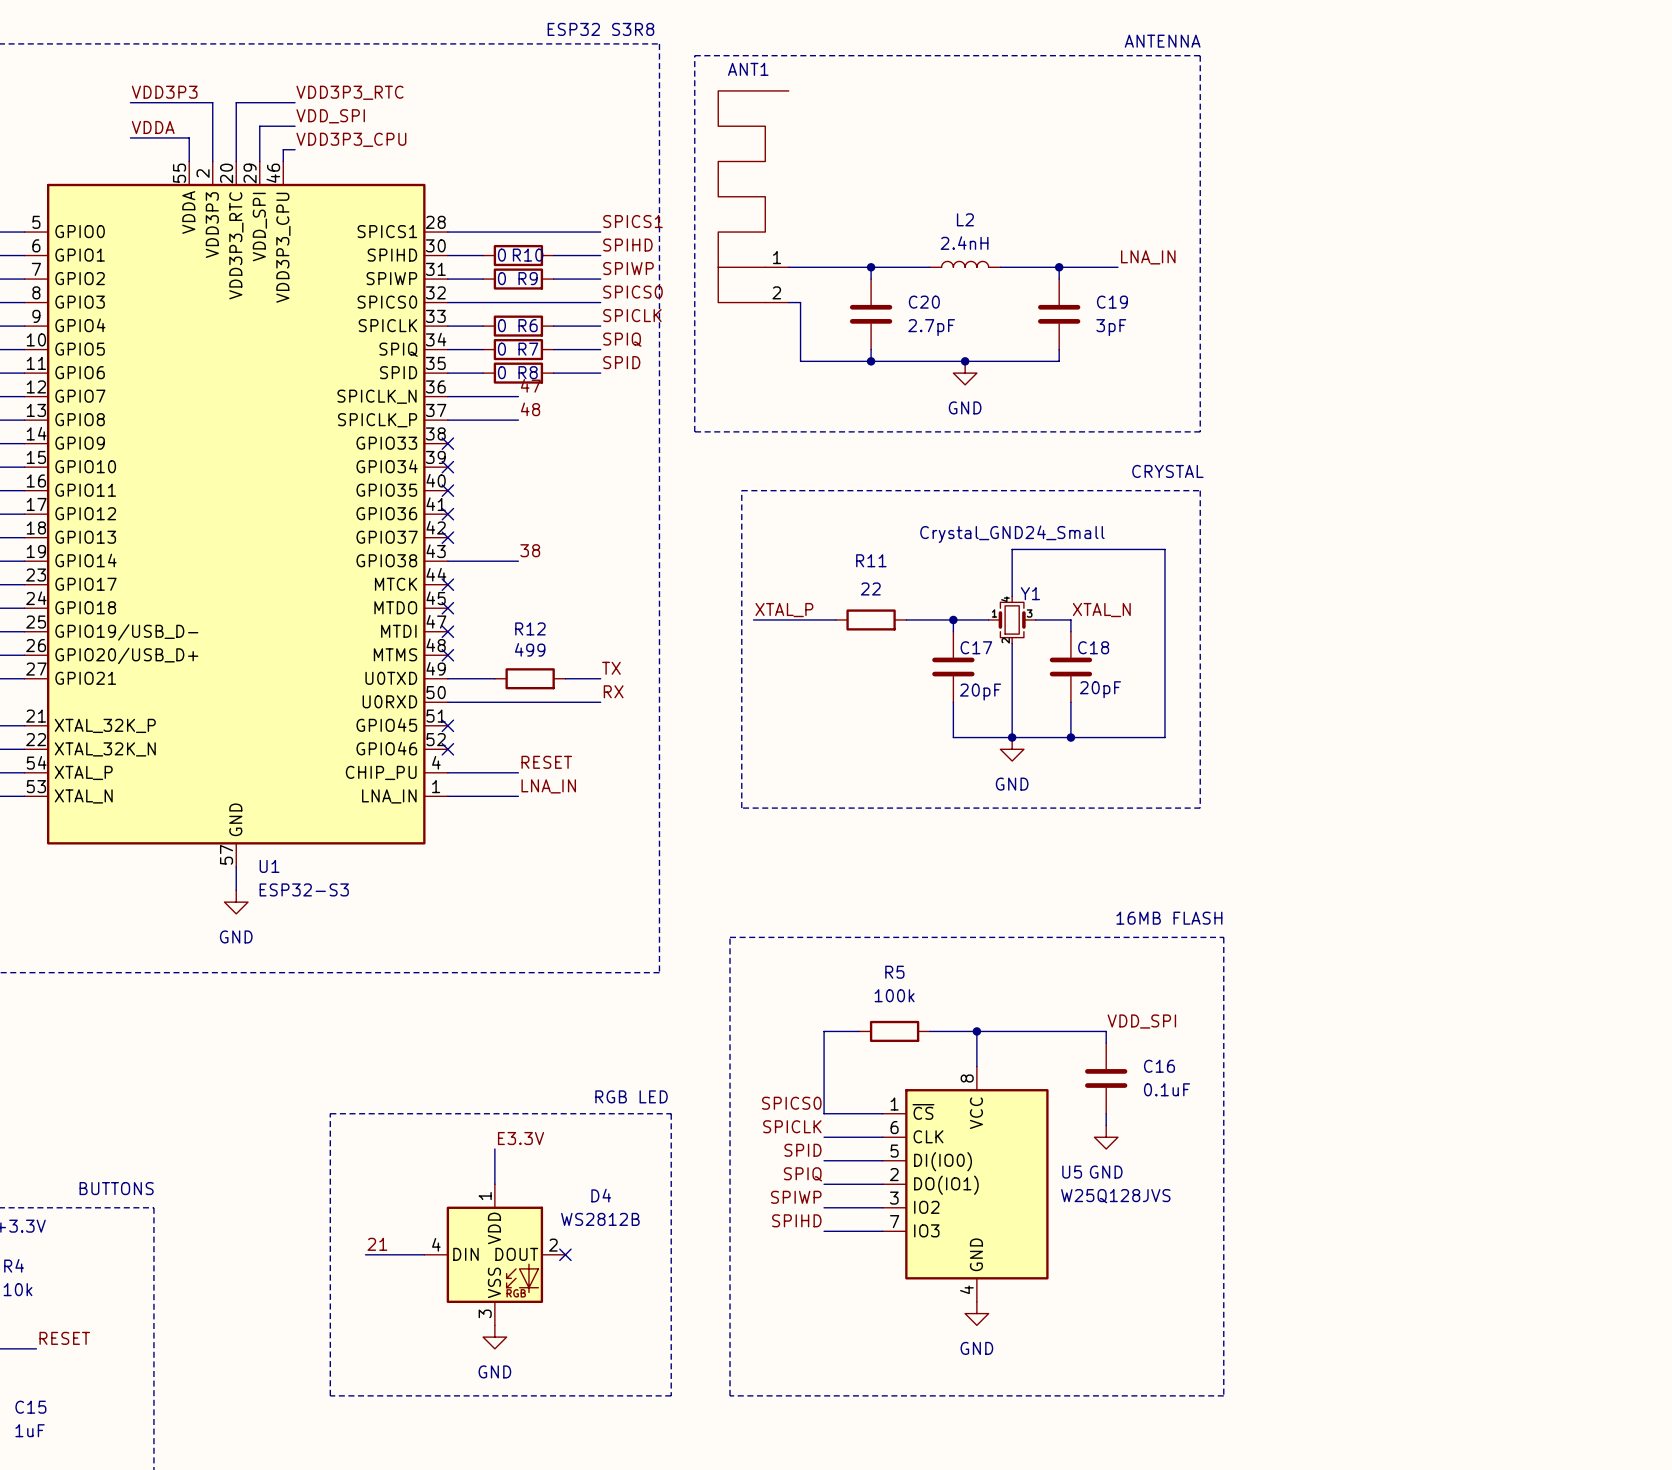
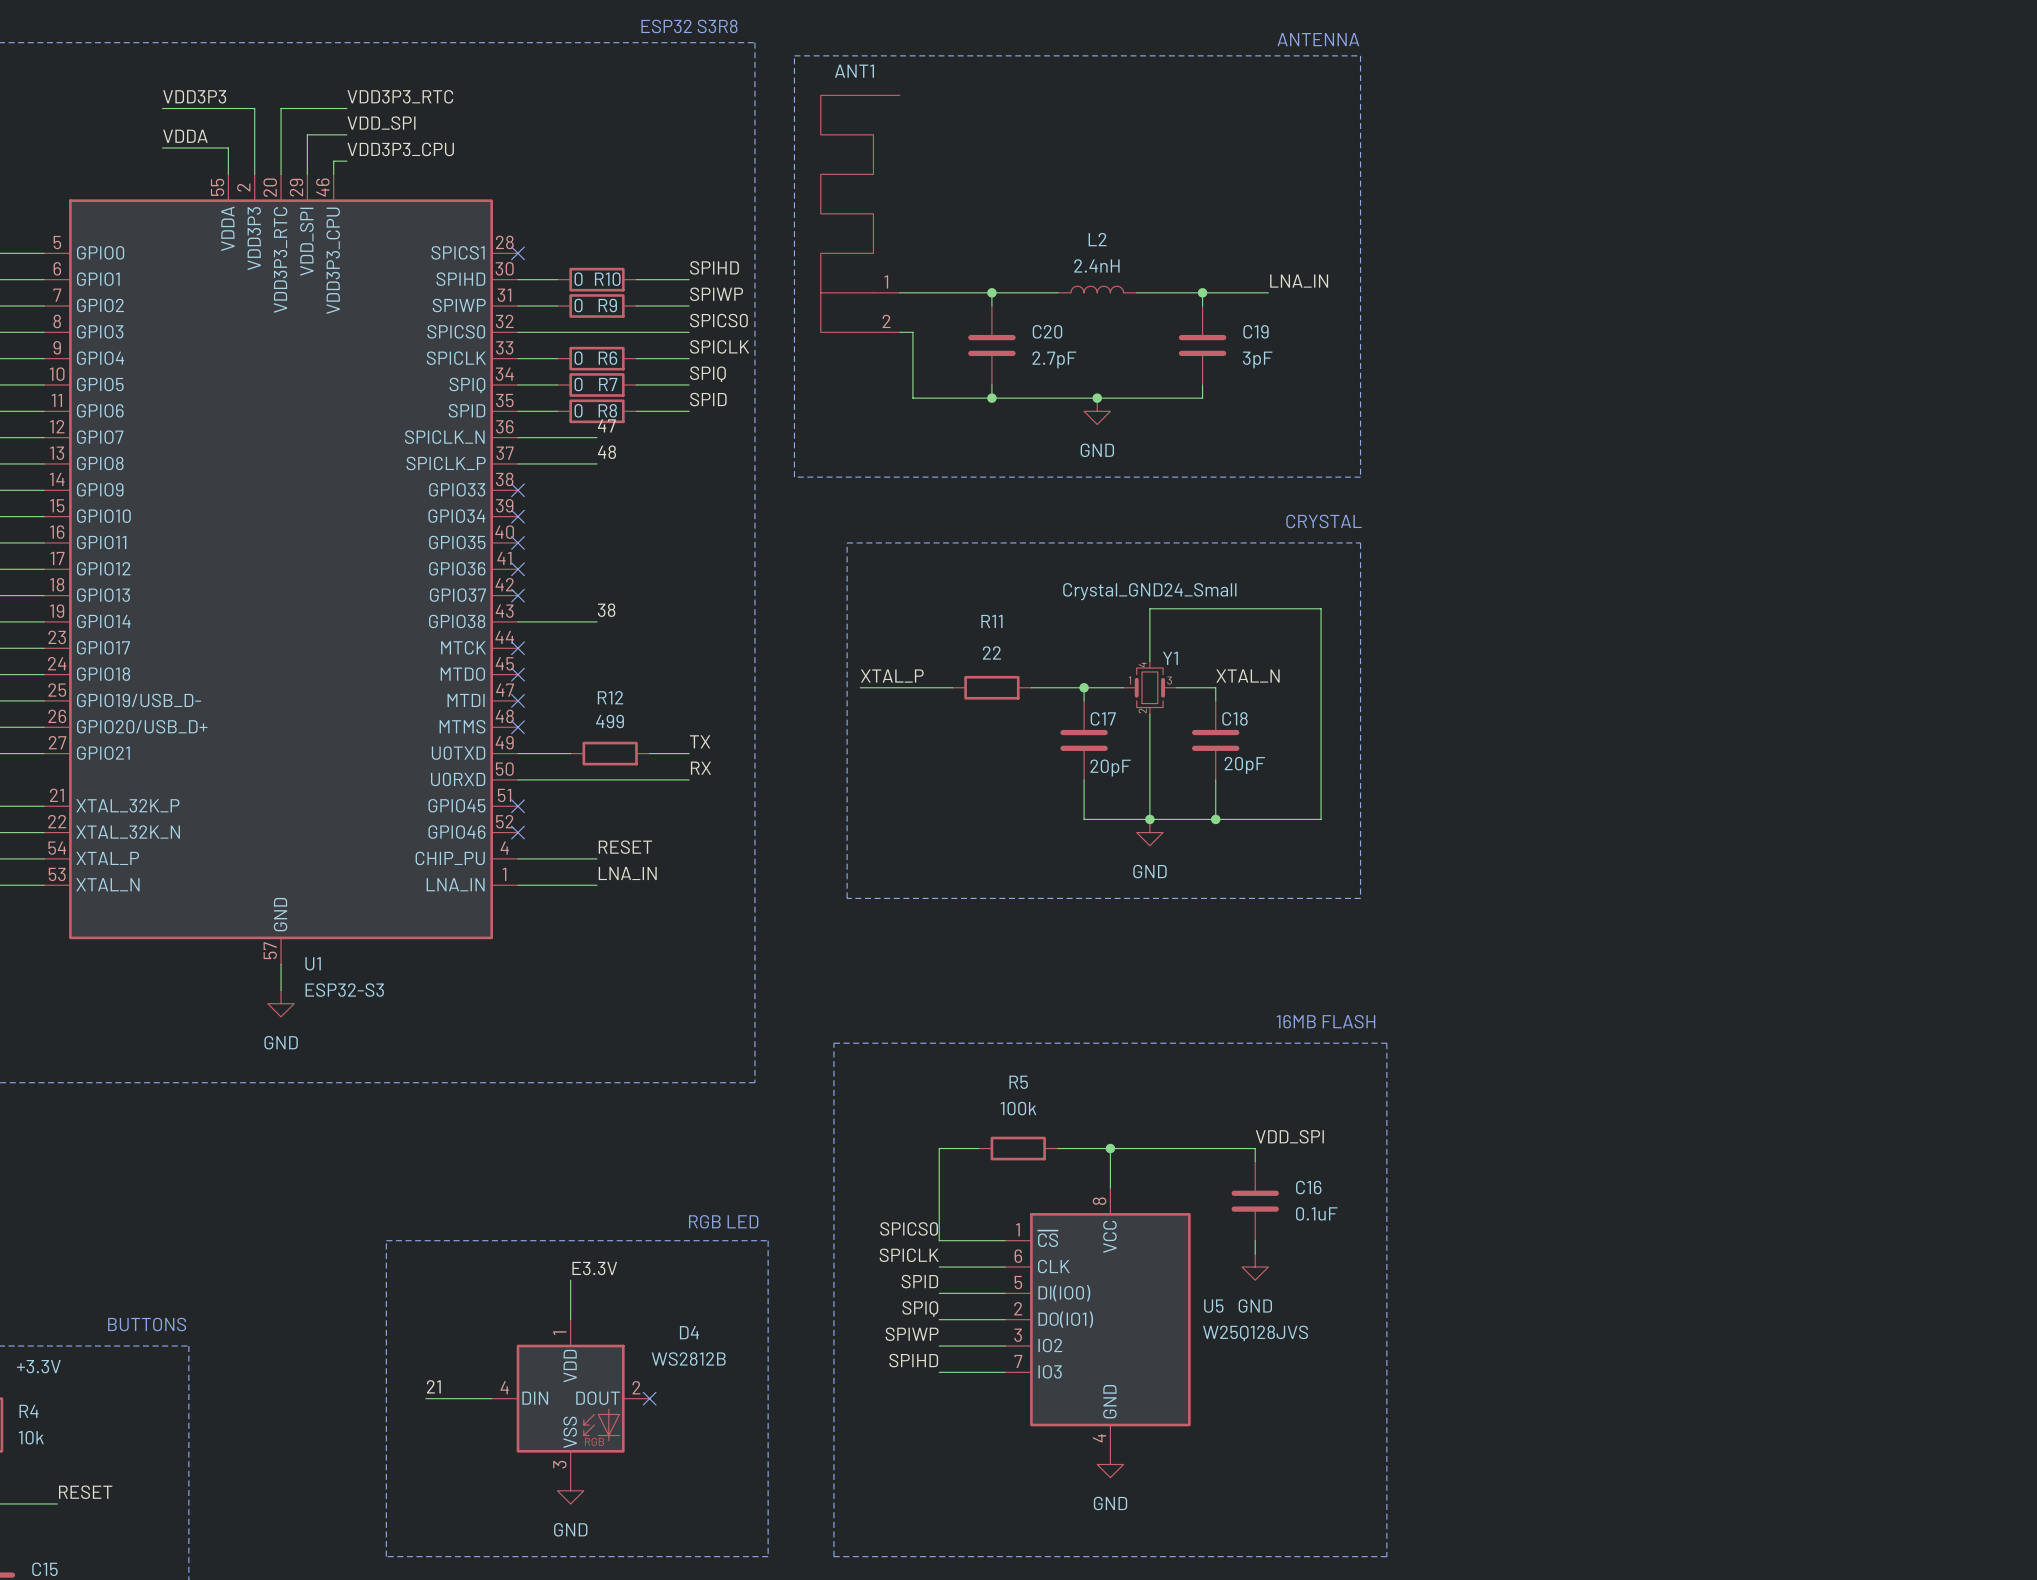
label: SPICS1 (632, 221) -> none
wire: (447, 232) (600, 232) -> none
no-connect mark: none -> (517, 253)

